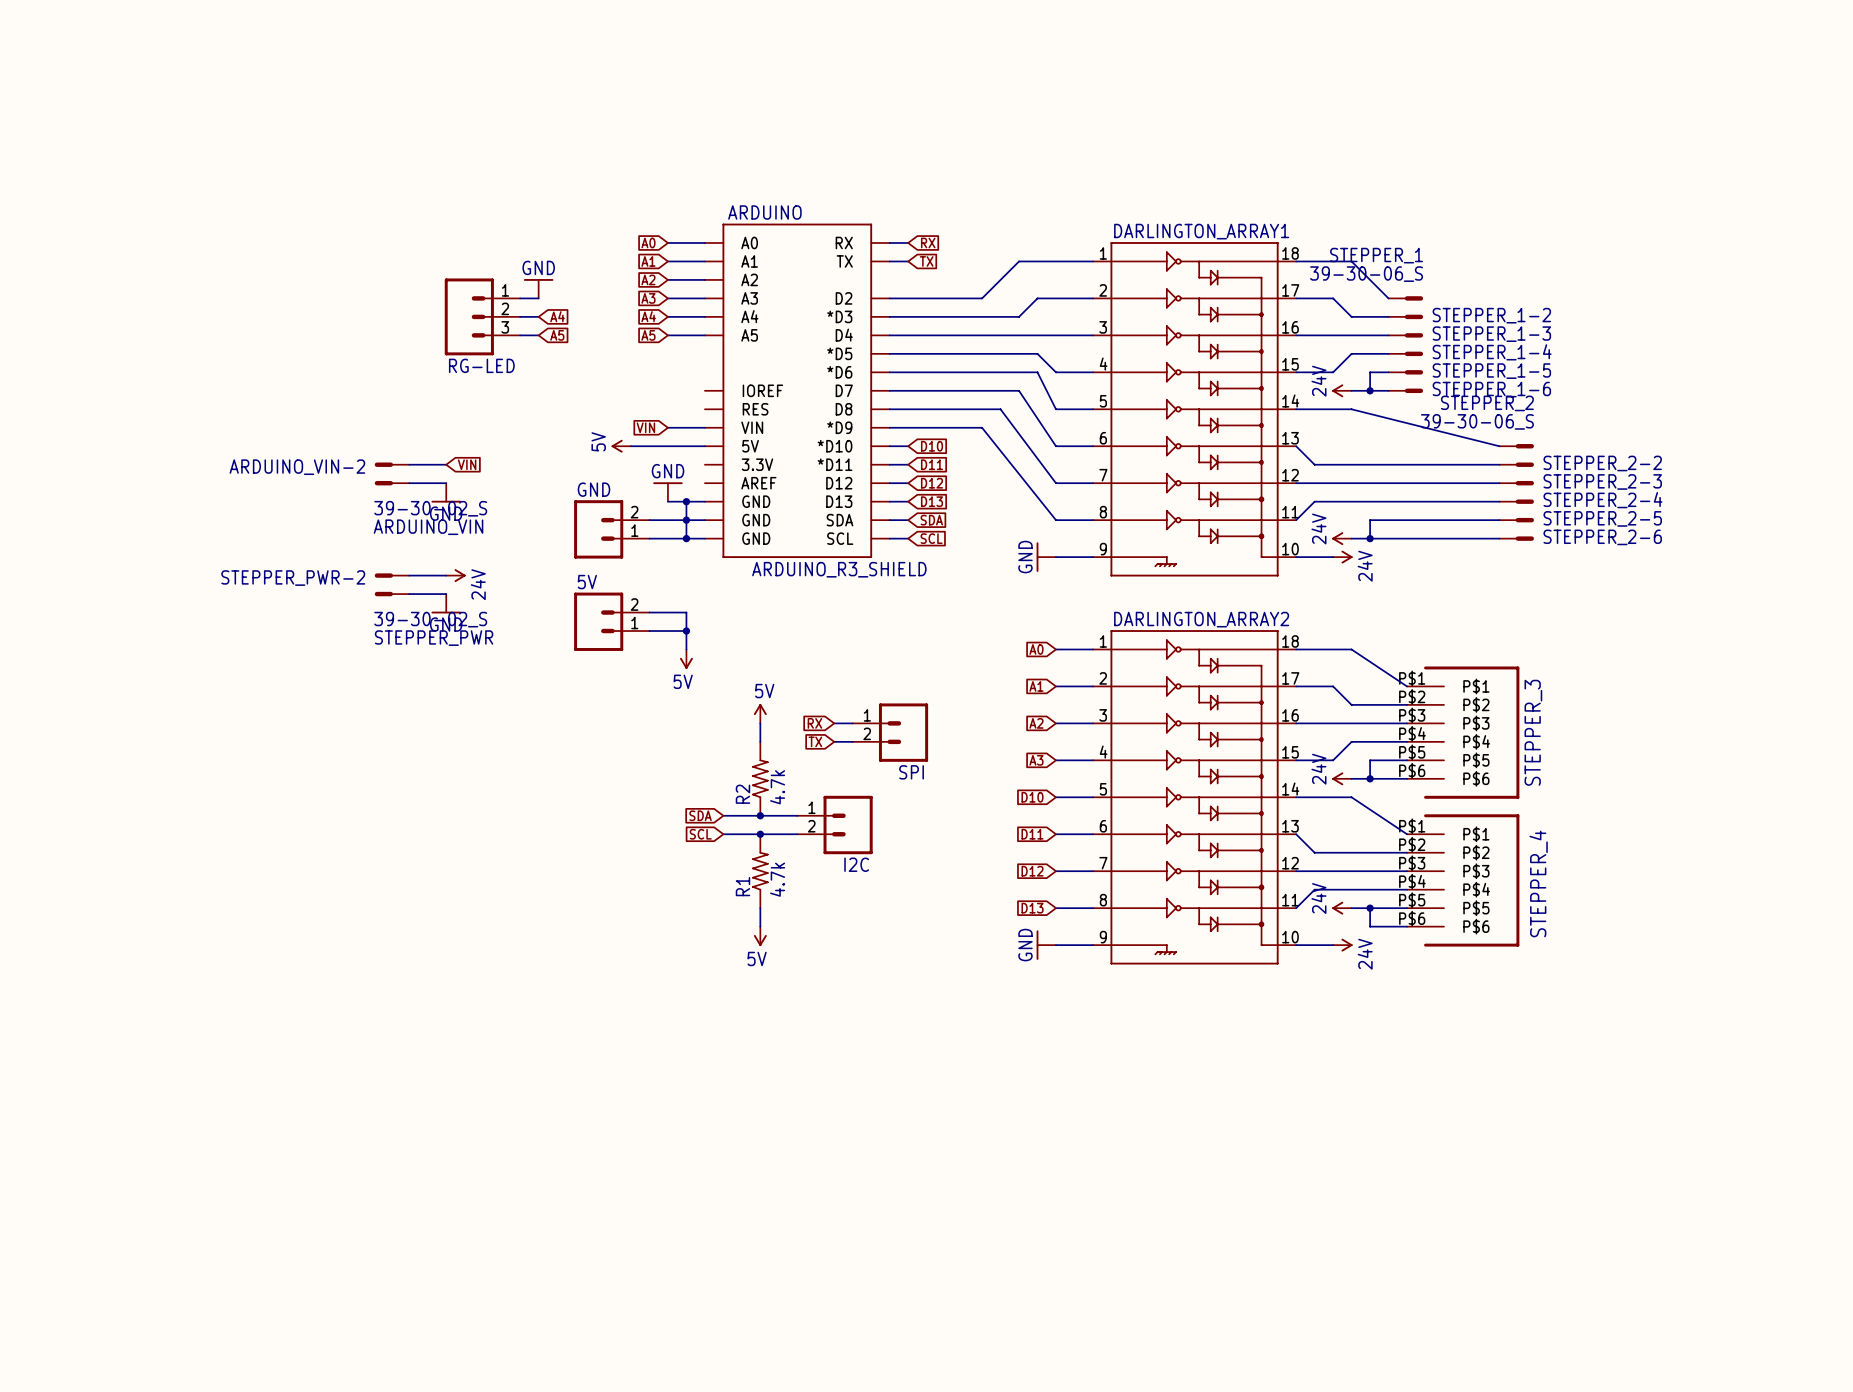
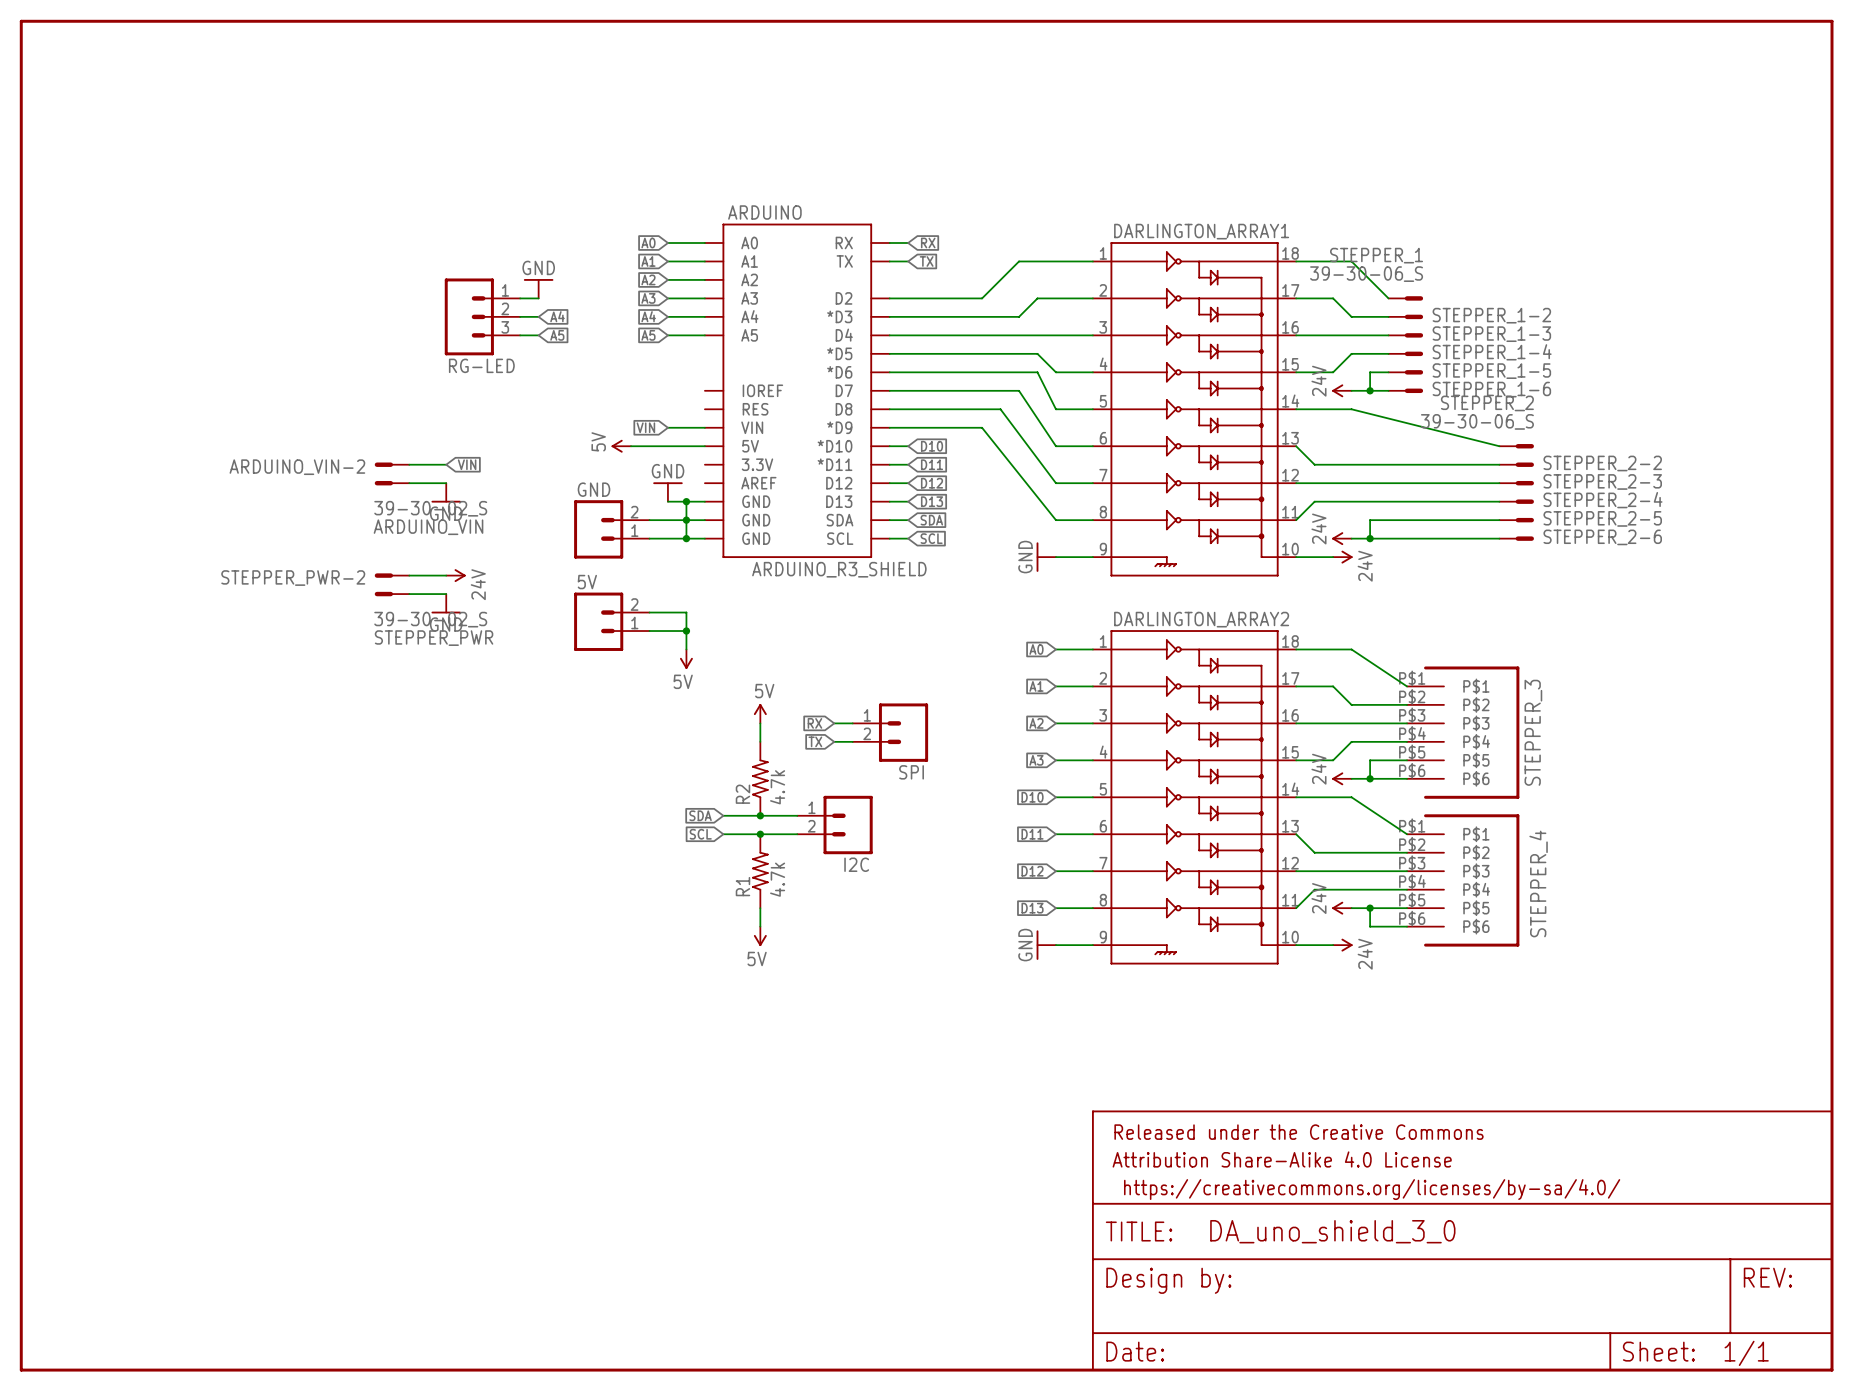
part: none -> (926, 695)
part: none -> (1462, 1240)

